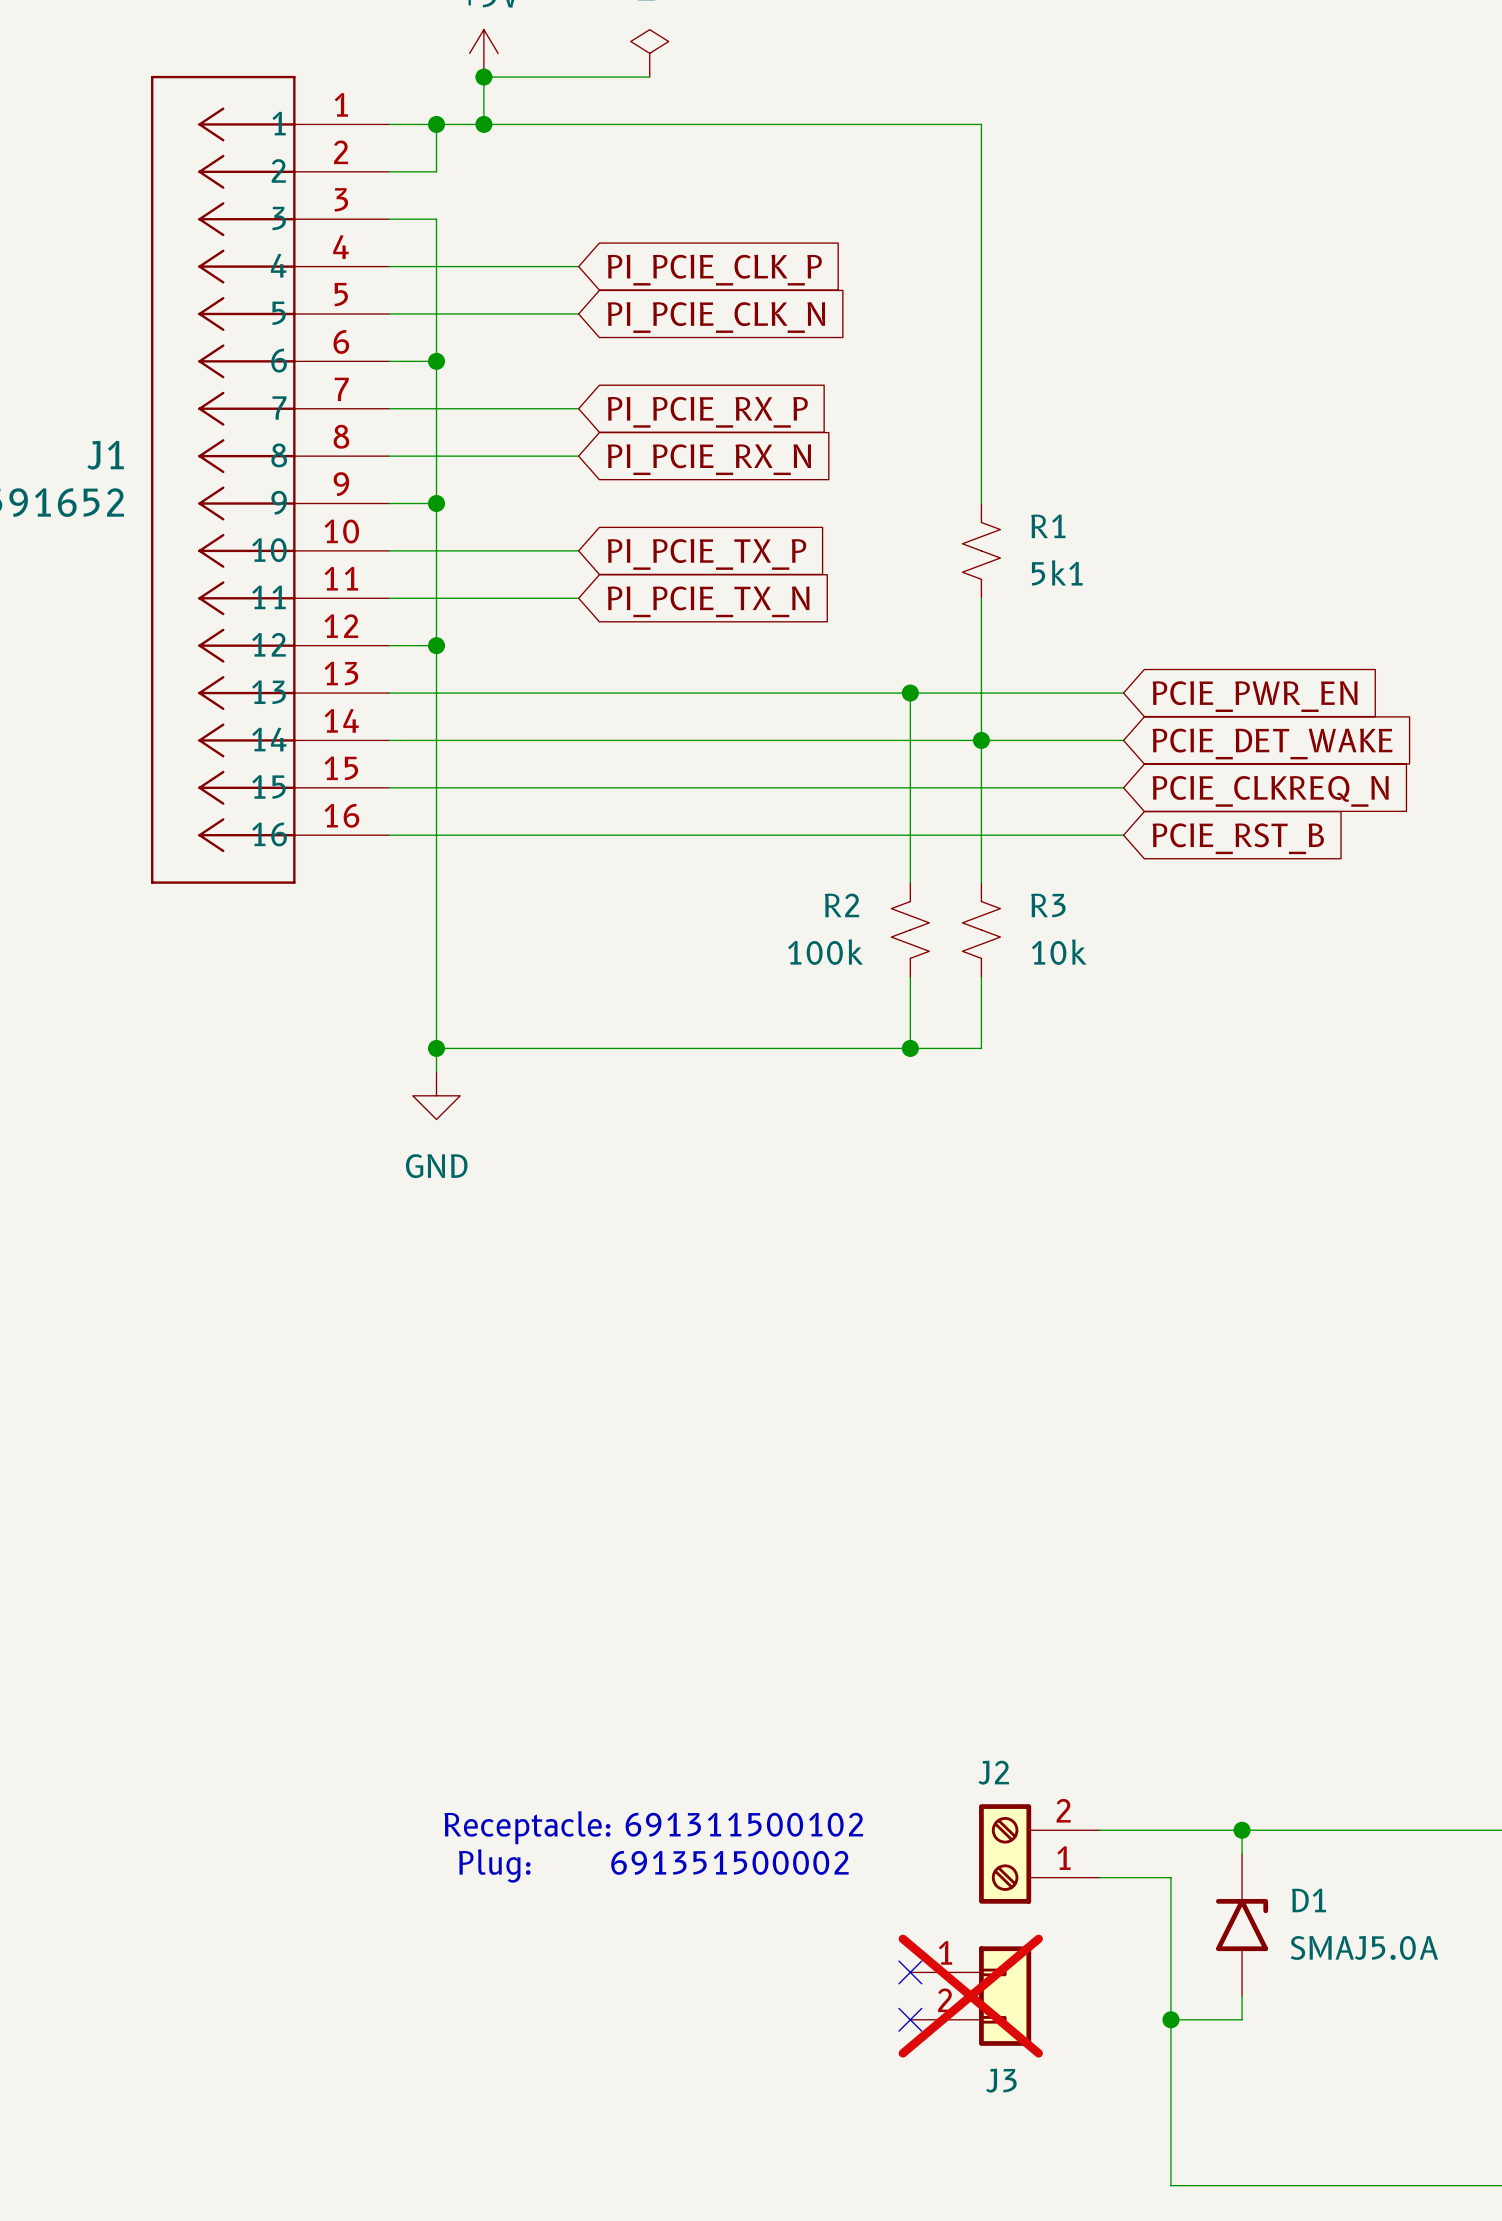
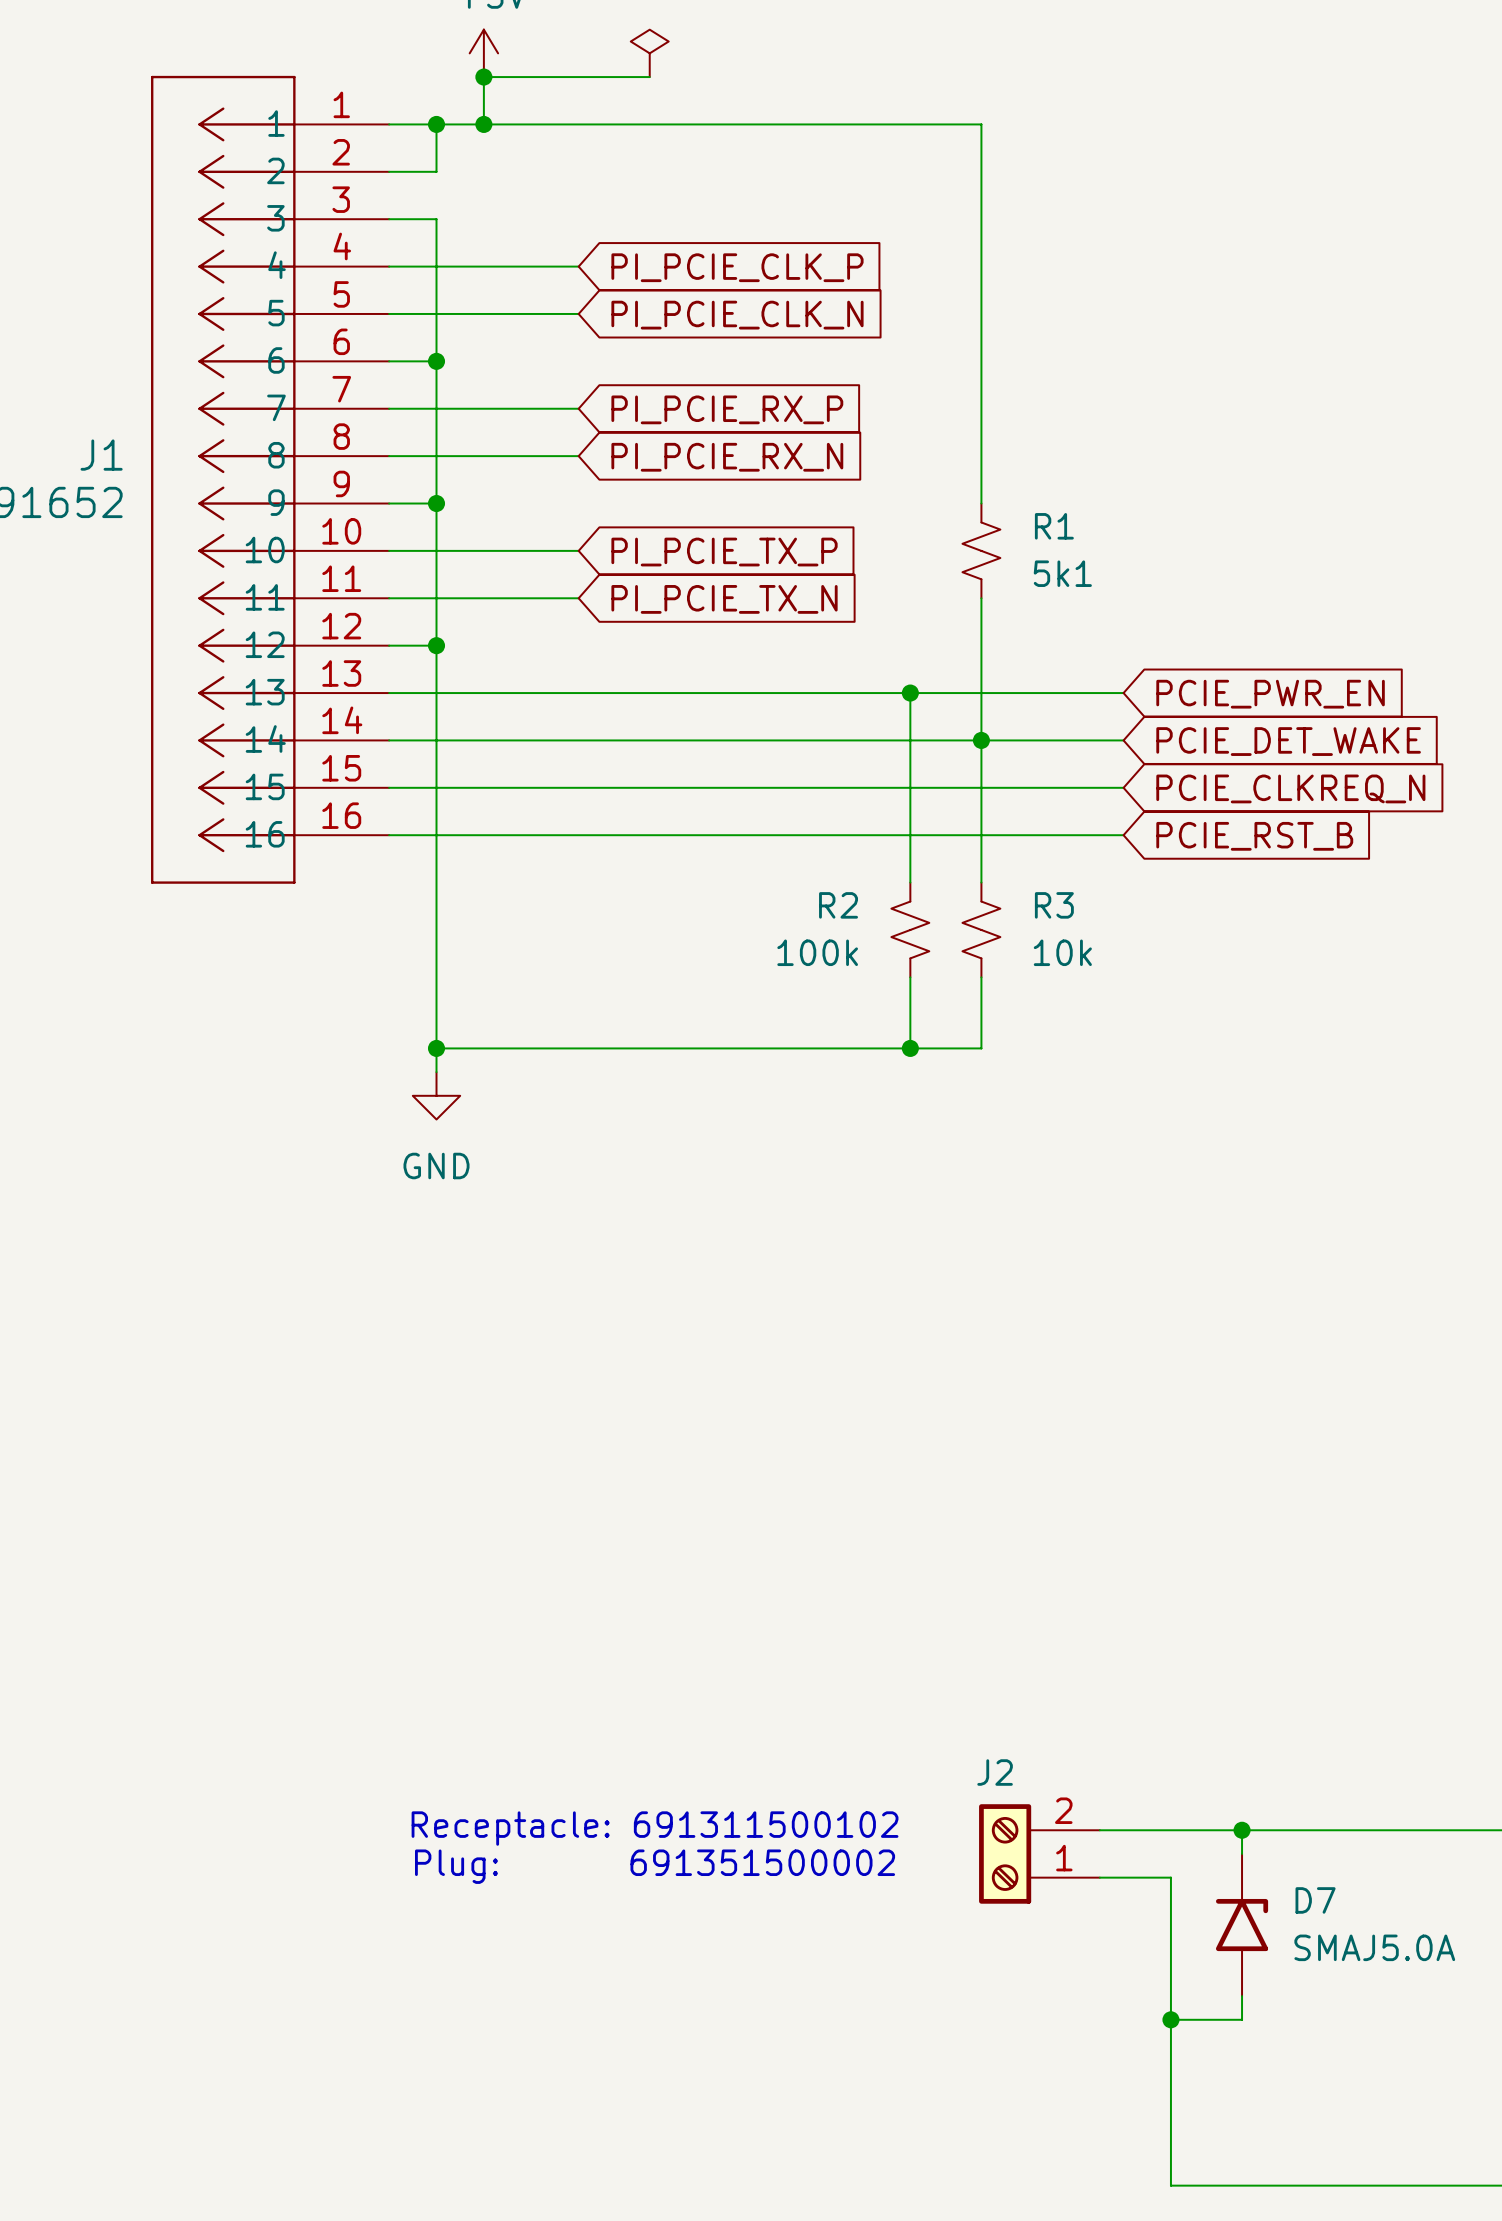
D1 name: D1 (1309, 1900) -> D7 (1315, 1900)
no-connect mark: (910, 1972) -> none
J3: (970, 1996) -> none
no-connect mark: (910, 2019) -> none

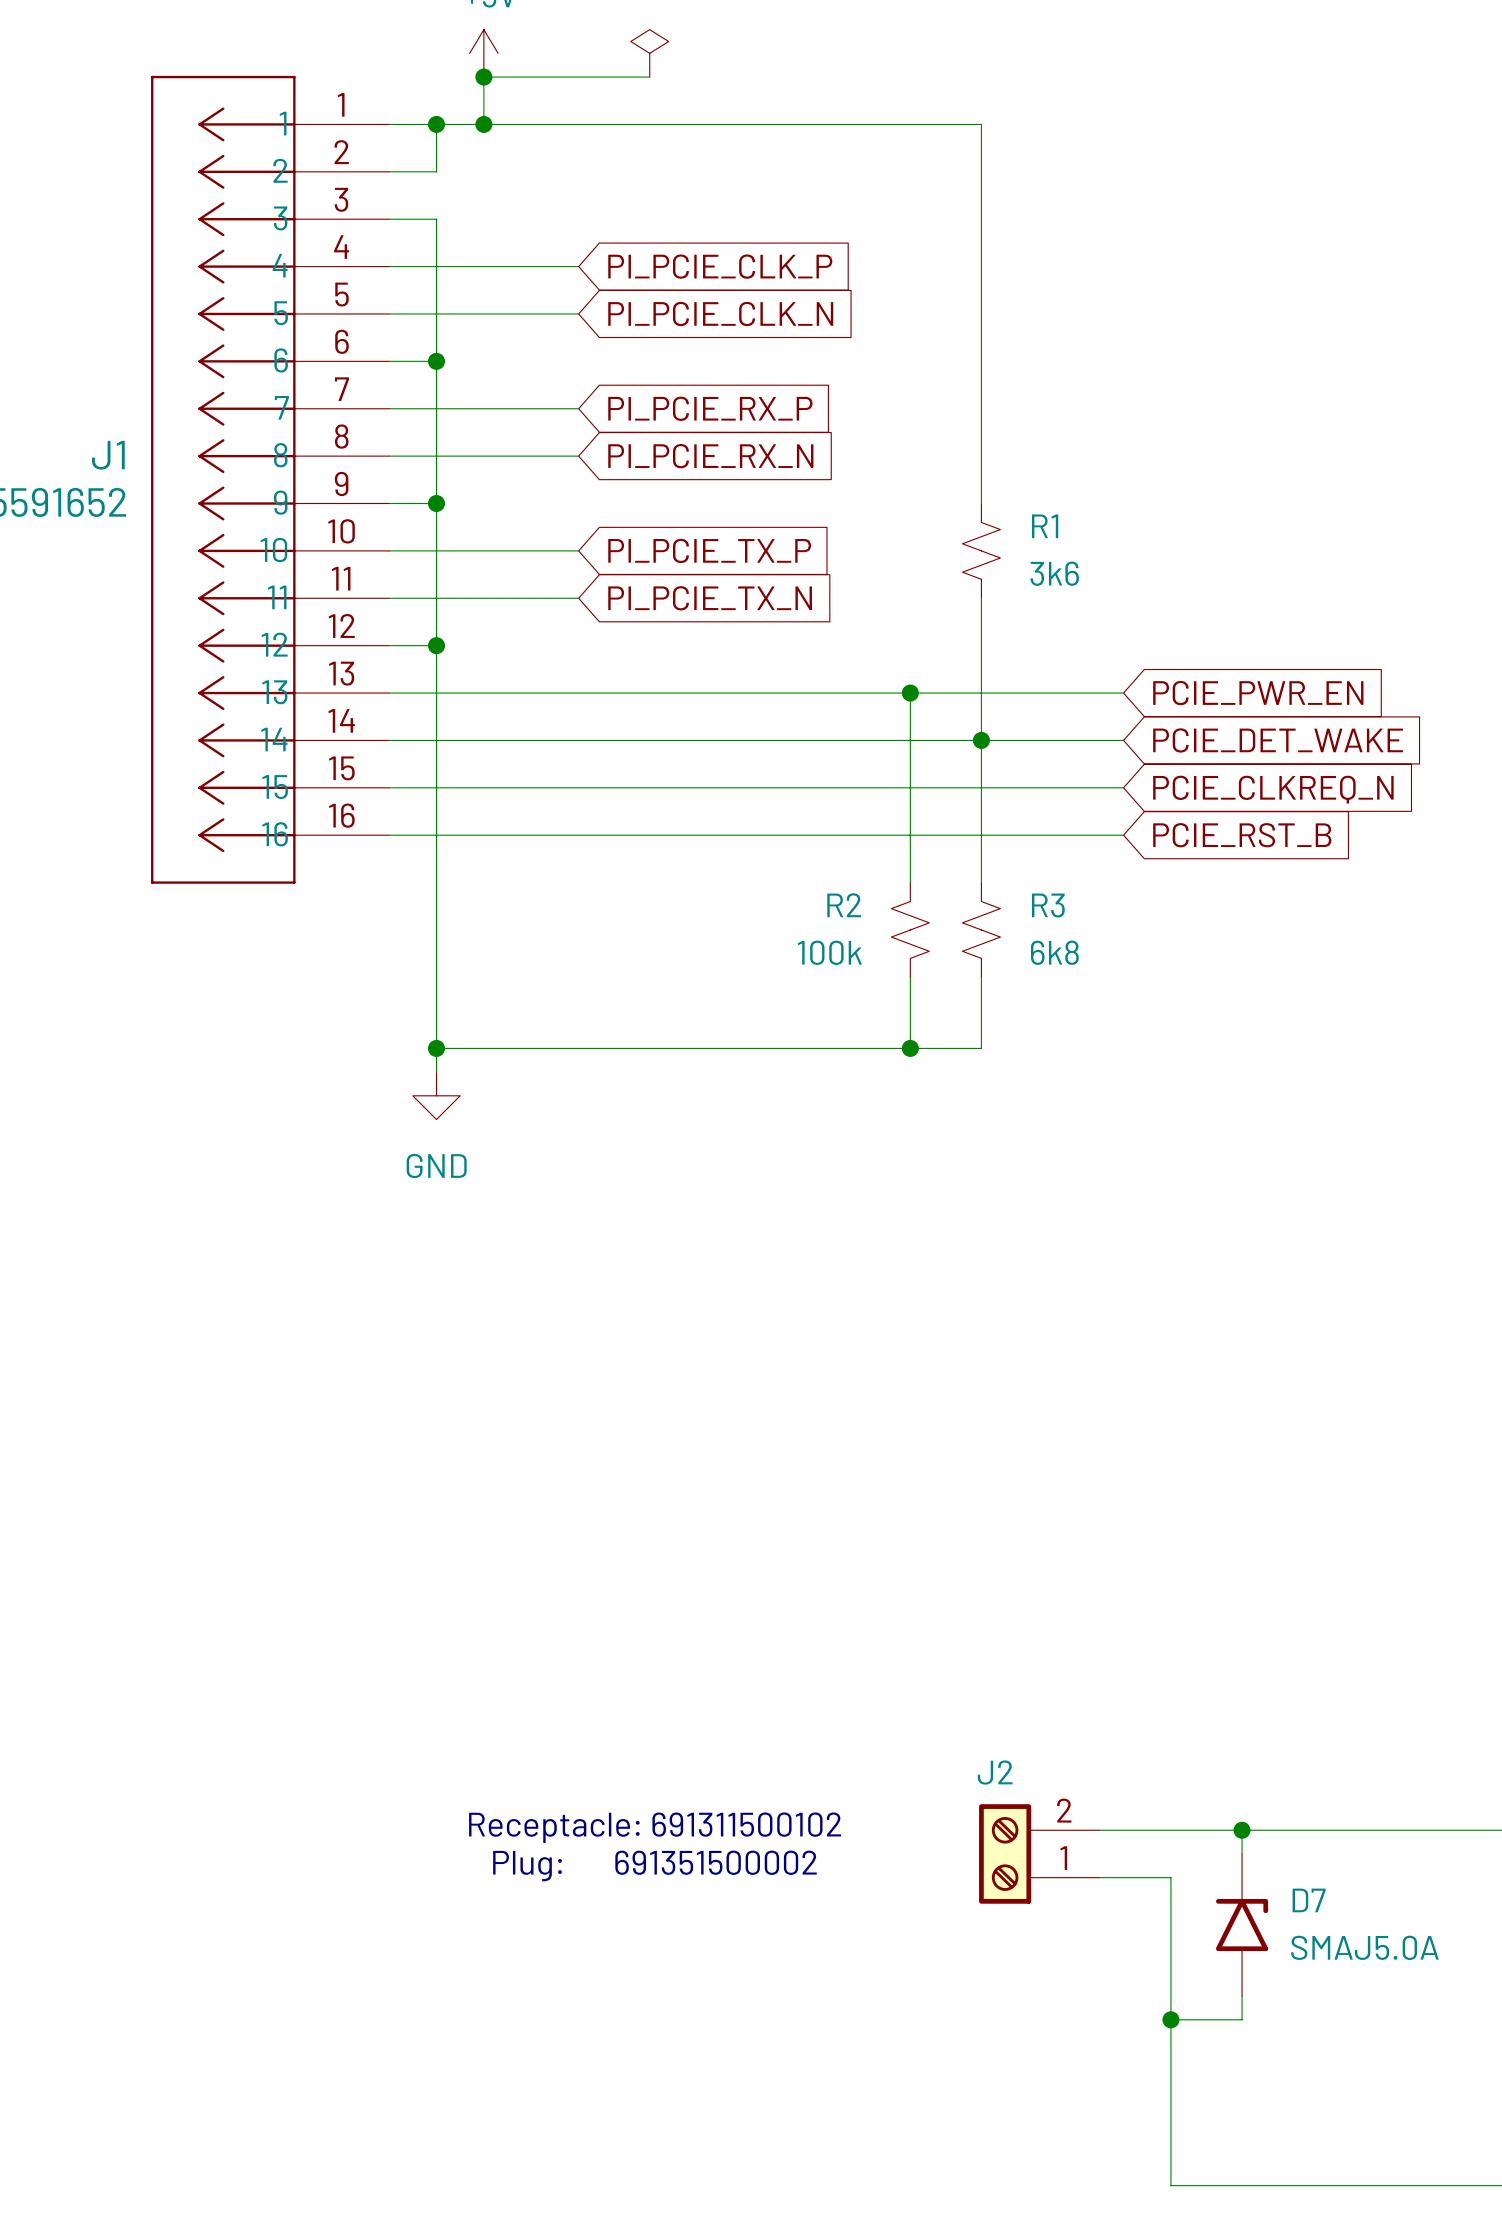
R1 value: 5k1 (1062, 573) -> 3k6 (1054, 573)
R3 value: 10k (1062, 952) -> 6k8 (1054, 952)

